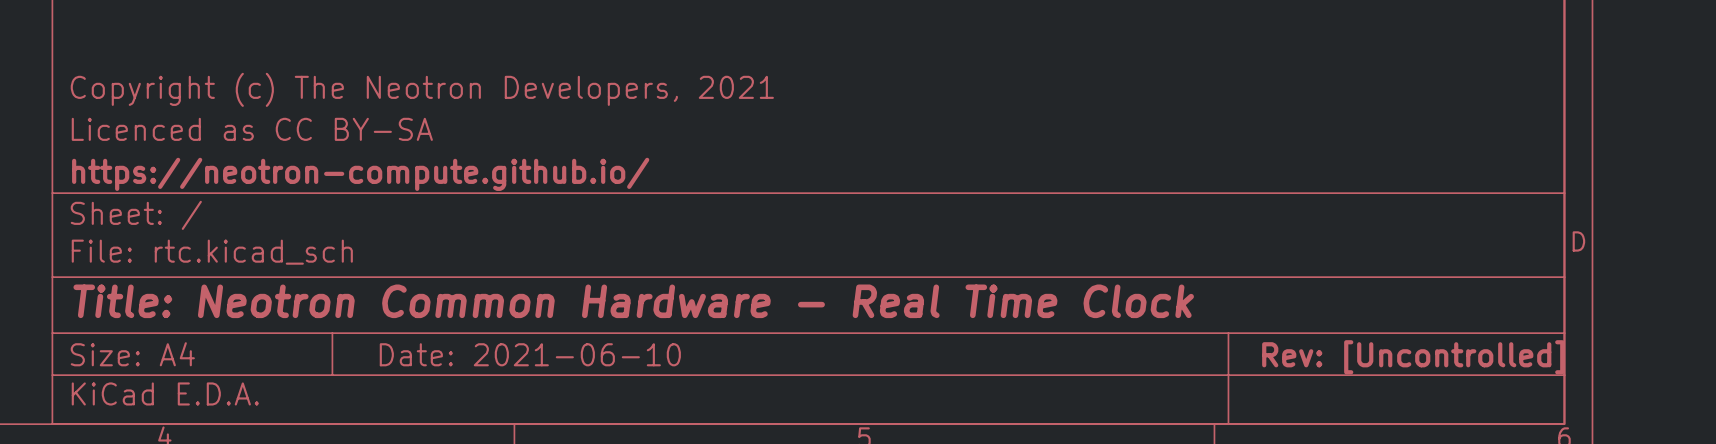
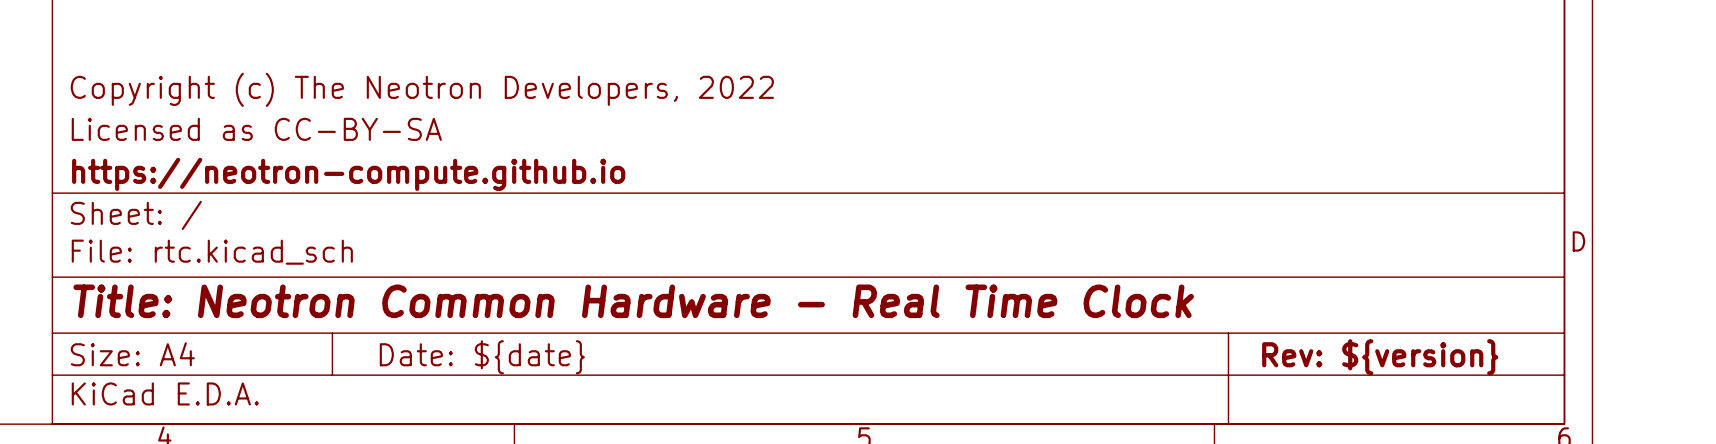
title block: Copyright (c) The Neotron Developers, 2021 (422, 89) -> Copyright (c) The Neotron Developers, 2022 (422, 89)
title block: Licenced as CC BY-SA (252, 129) -> Licensed as CC-BY-SA (256, 129)
title block: https://neotron-compute.github.io/ (360, 174) -> https://neotron-compute.github.io (348, 174)
title block: Date: 2021-06-10 (530, 354) -> Date: ${date} (482, 357)
title block: Rev: [Uncontrolled] (1413, 357) -> Rev: ${version} (1380, 357)

